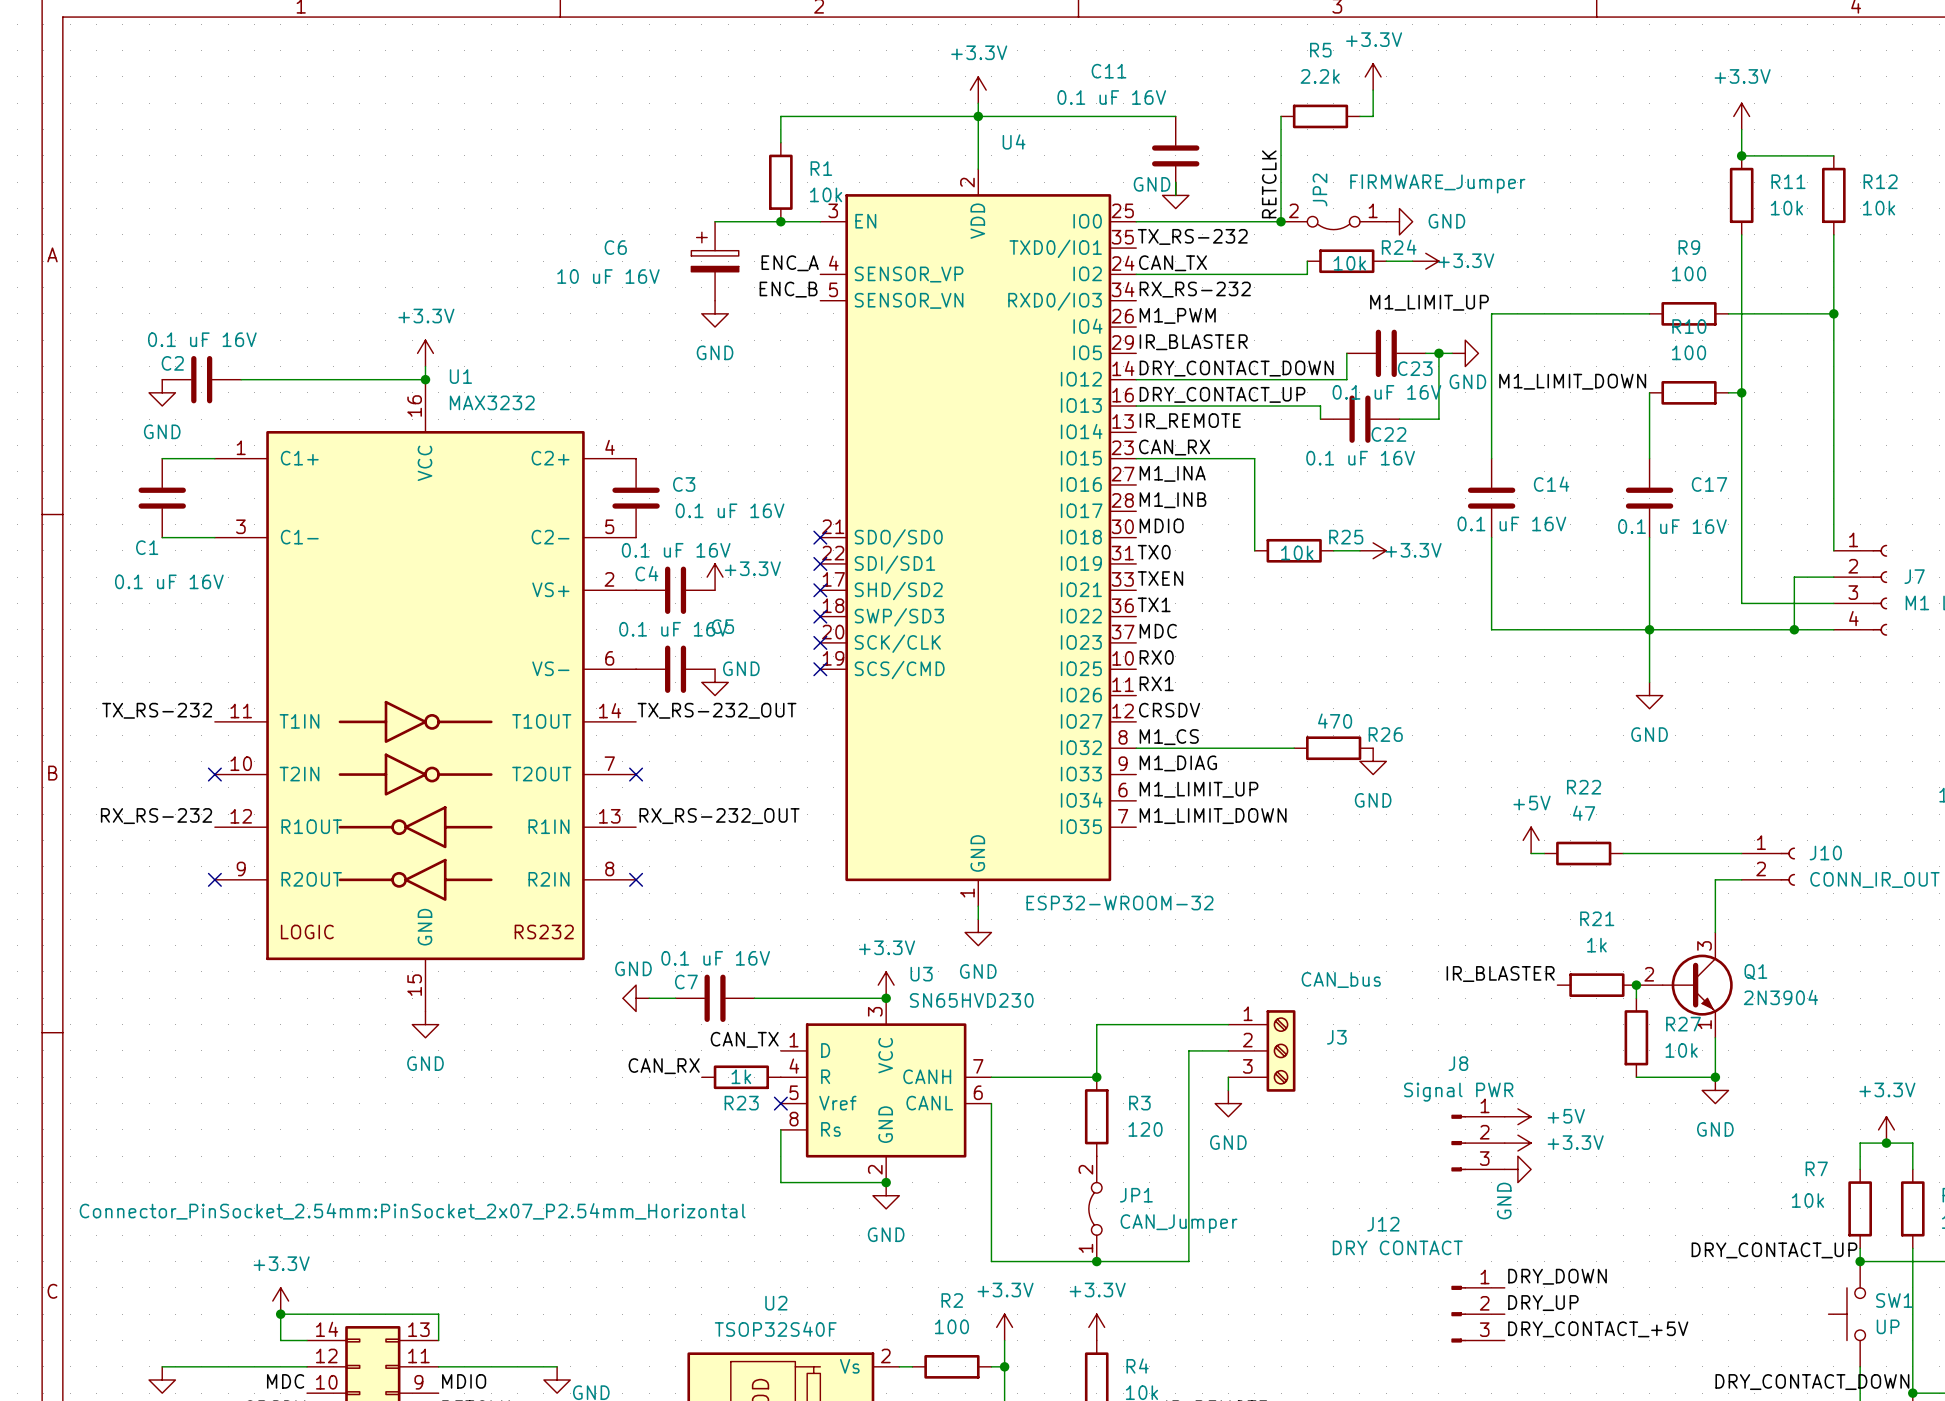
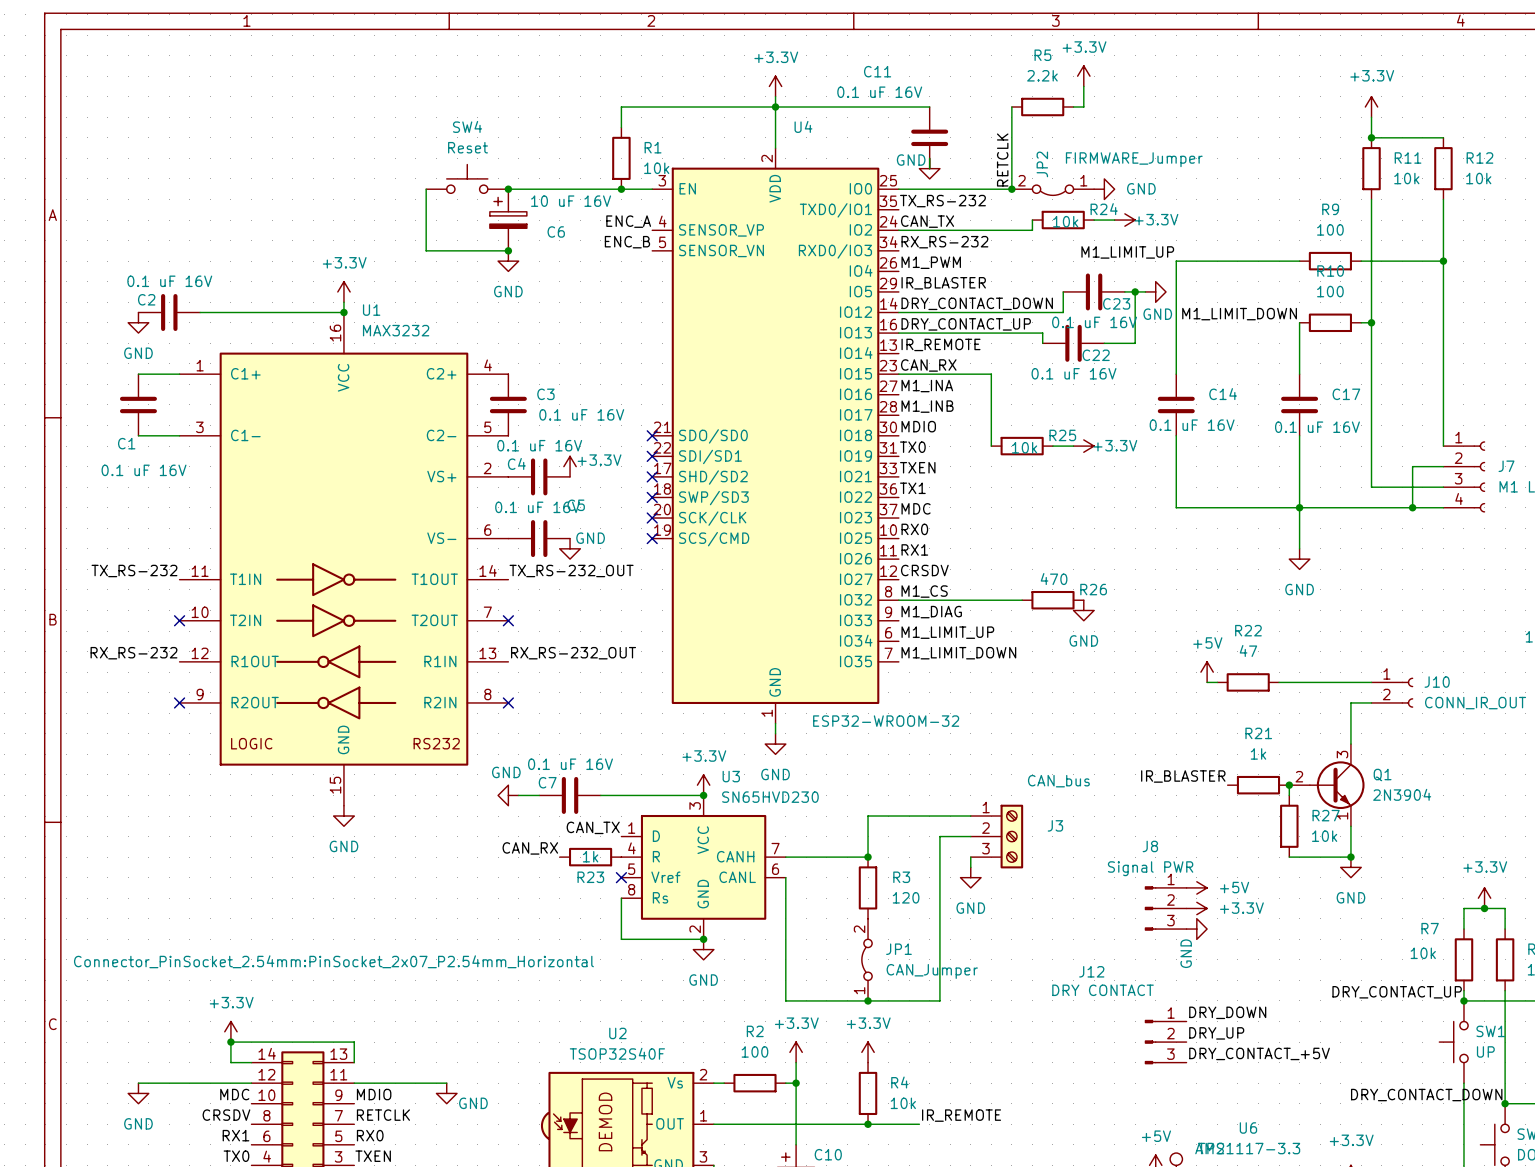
SW4: none -> Reset (467, 178)
wire: none -> (426, 189) (426, 250) (508, 250)
wire: none -> (508, 189) (570, 189)
junction: none -> (508, 189)
C6 name position: C6 (615, 247) -> C6 (556, 231)
C6 position: (715, 261) -> (508, 220)
C6 value position: 10 uF 16V (608, 276) -> 10 uF 16V (571, 201)
junction: none -> (508, 250)
power symbol position: GND (715, 313) -> GND (508, 261)

